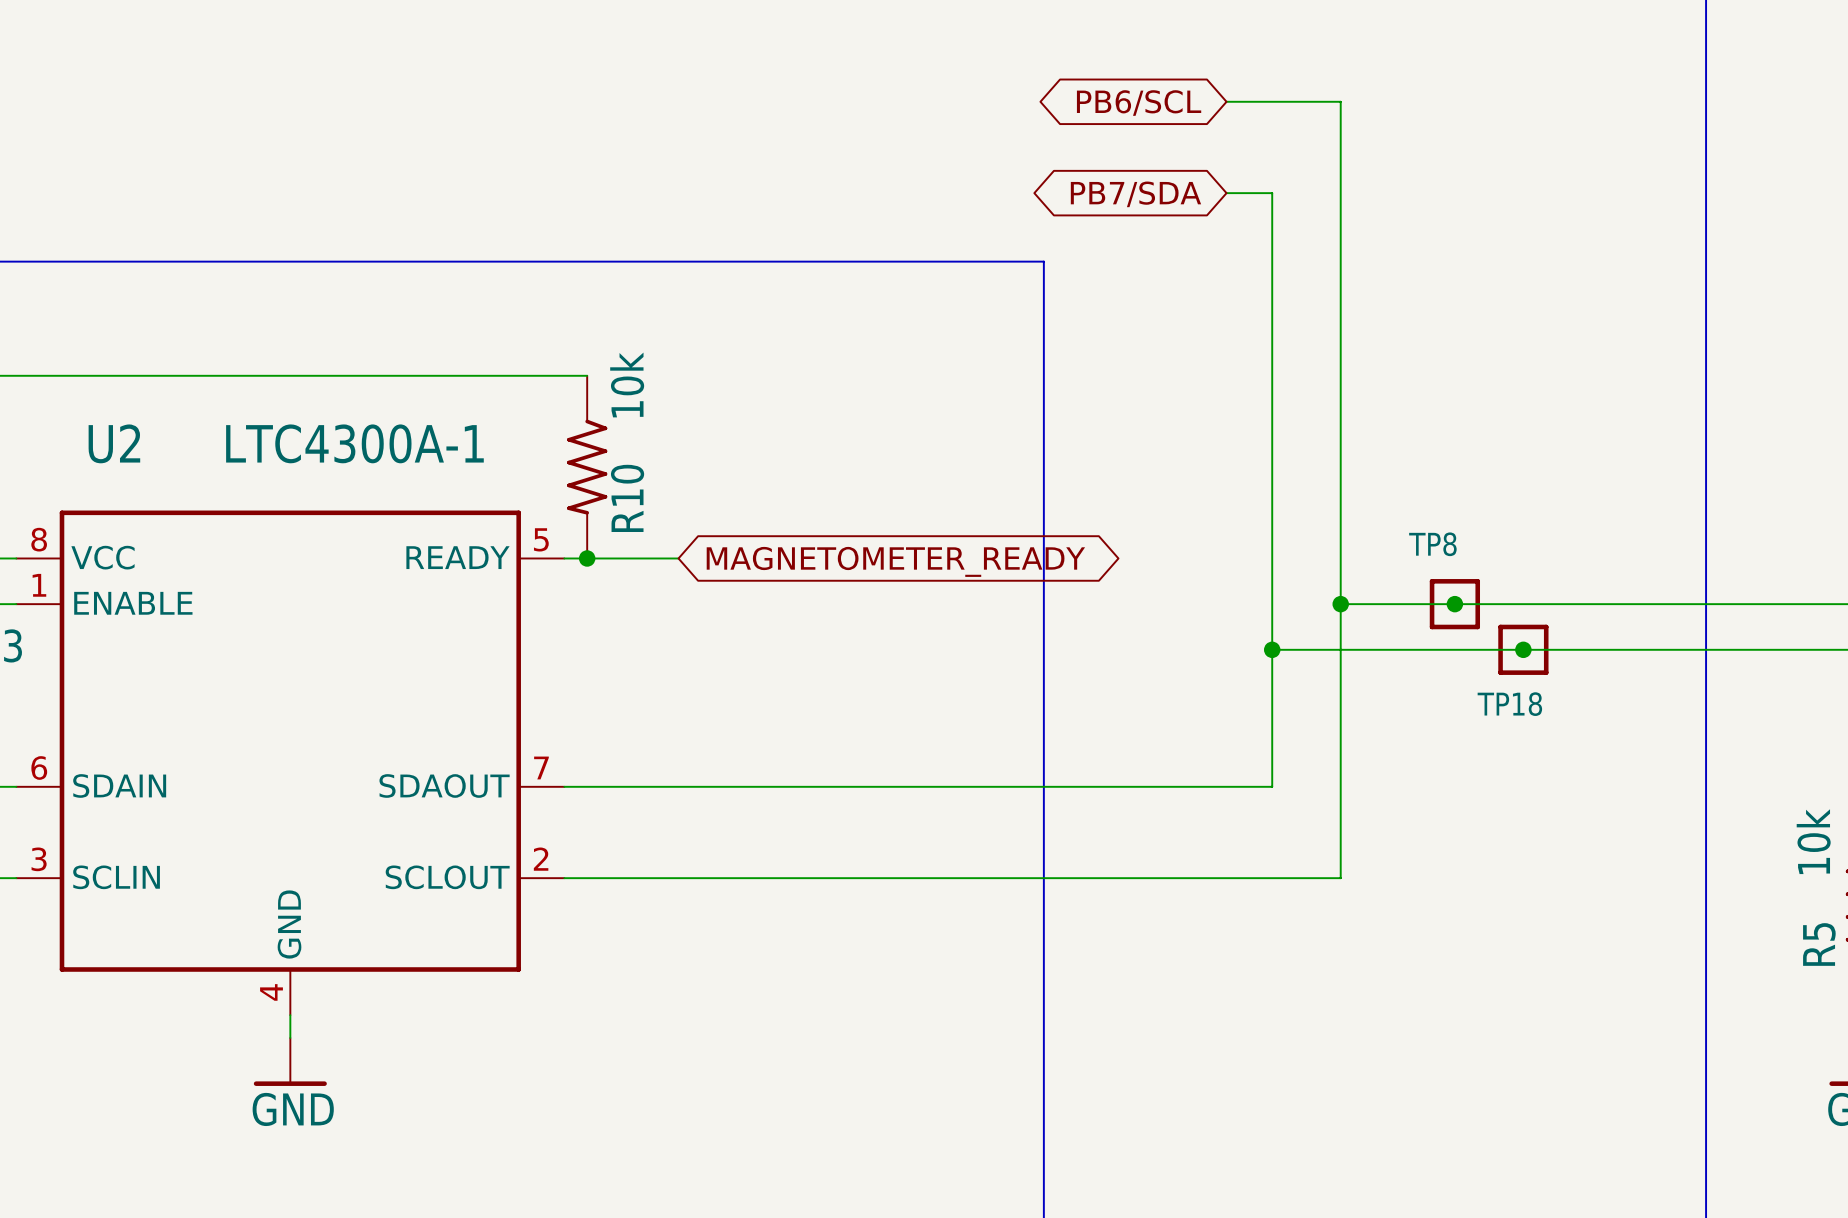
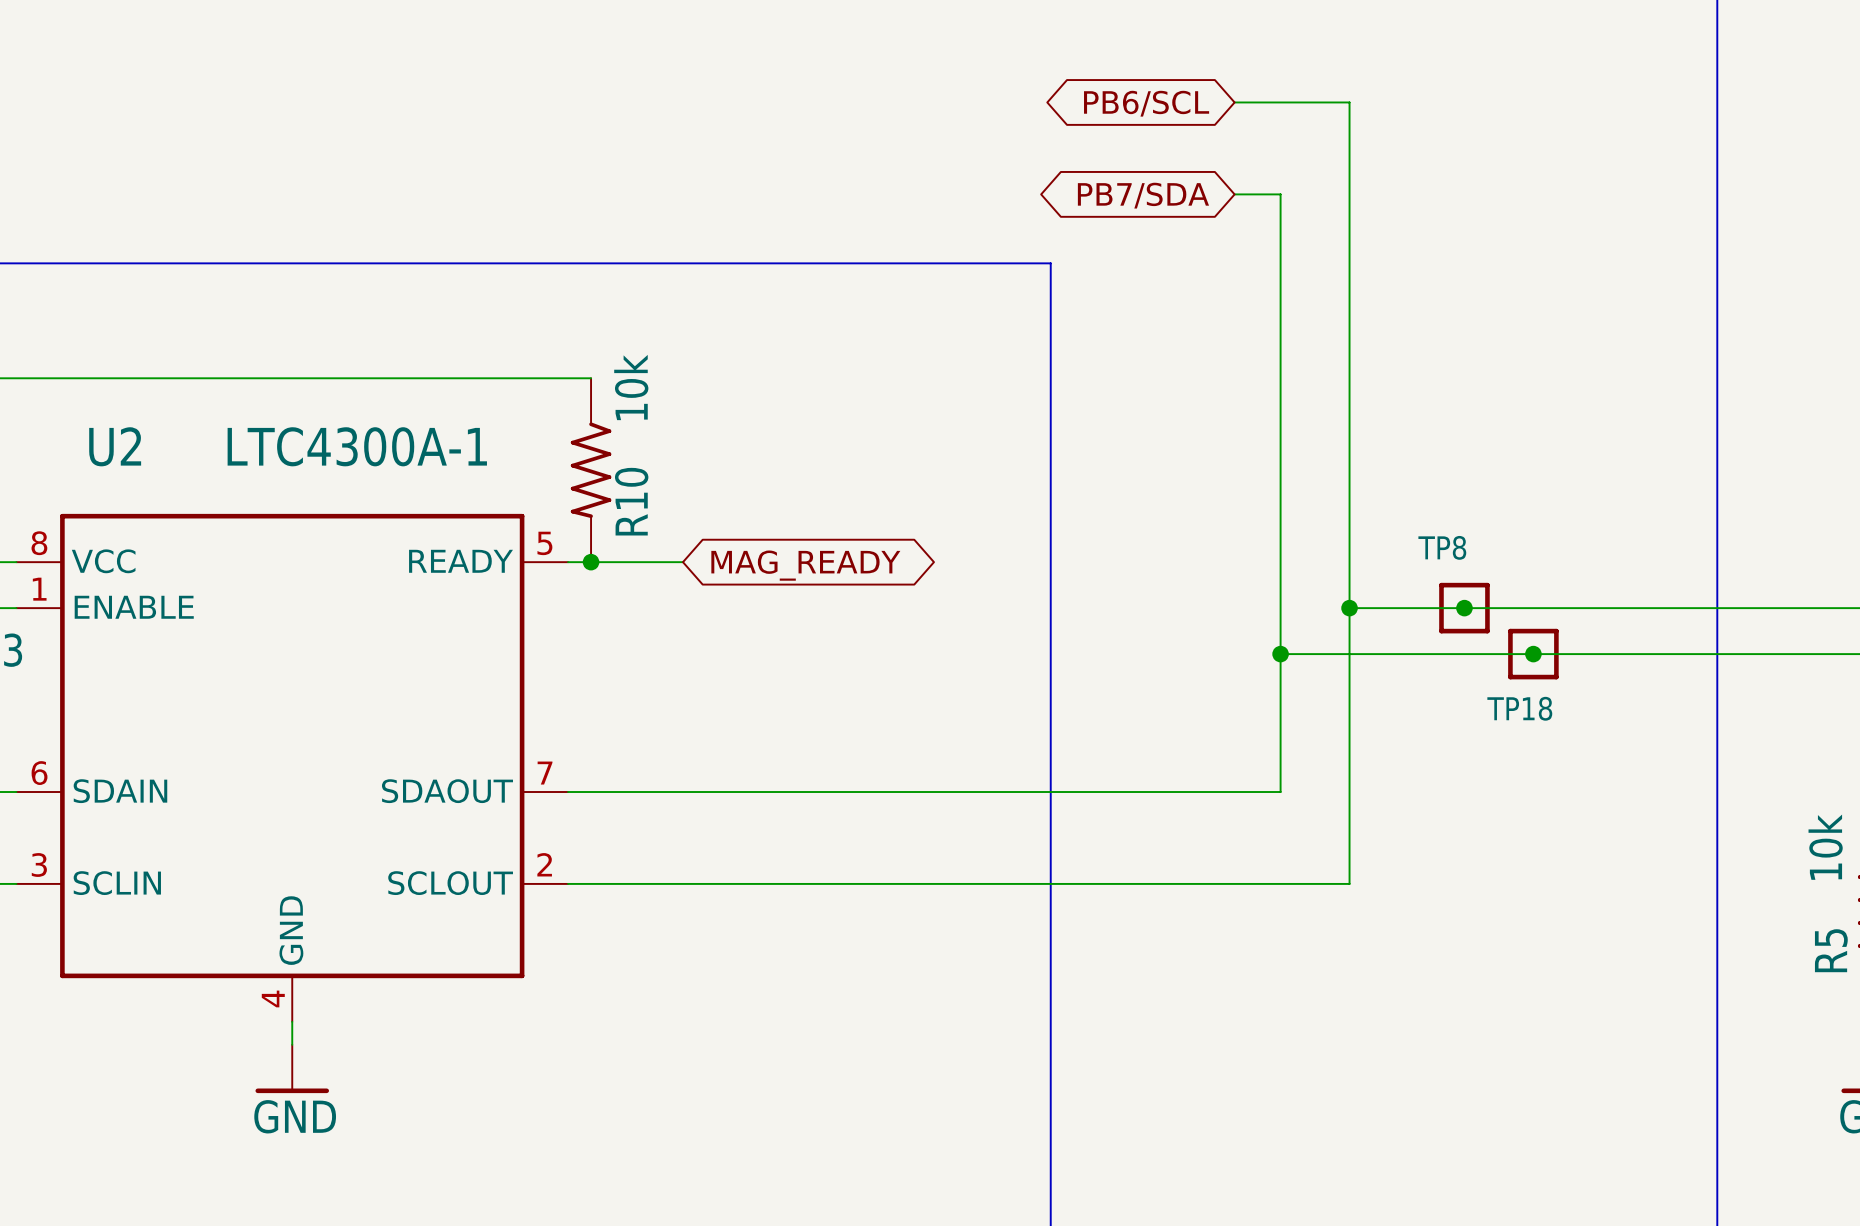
global label: MAGNETOMETER_READY (895, 561) -> MAG_READY (805, 565)

